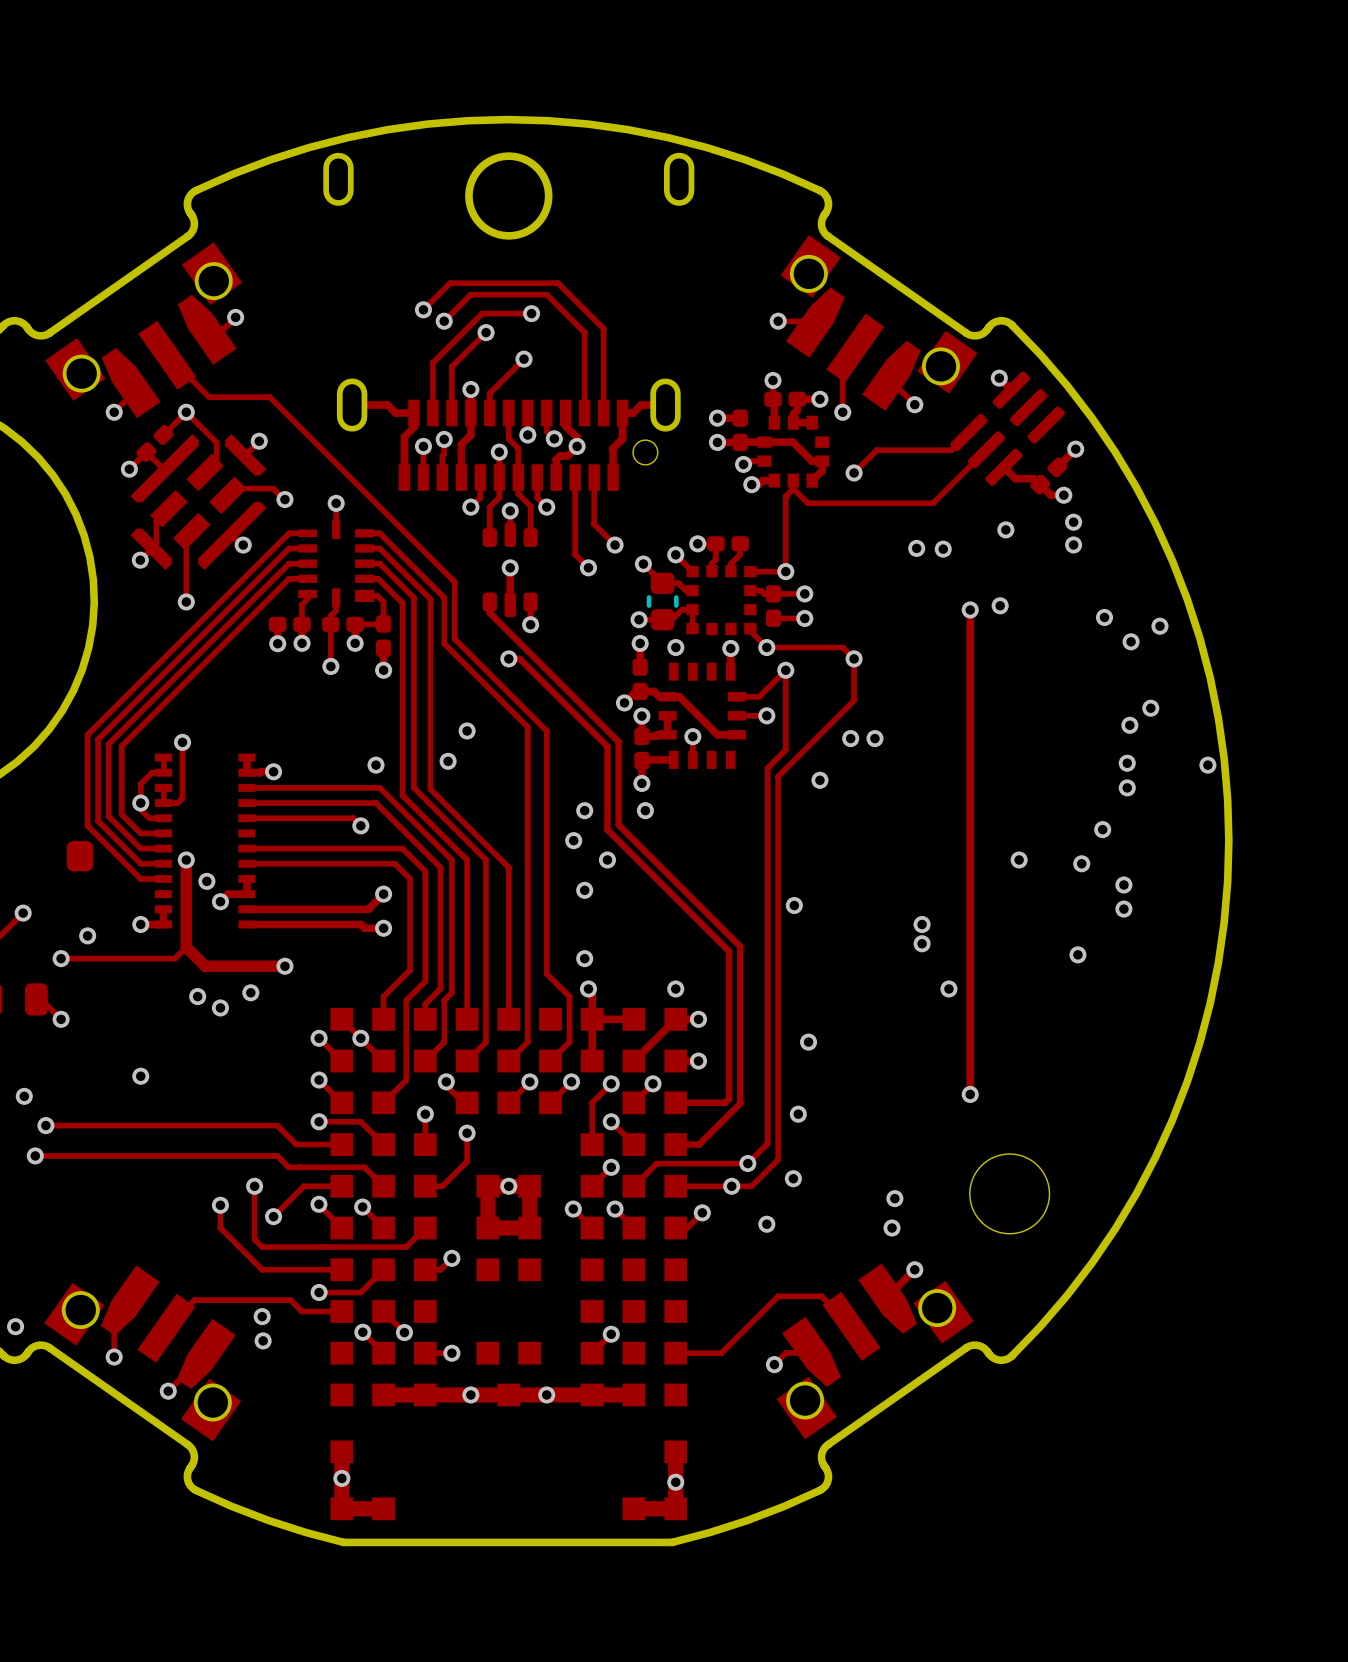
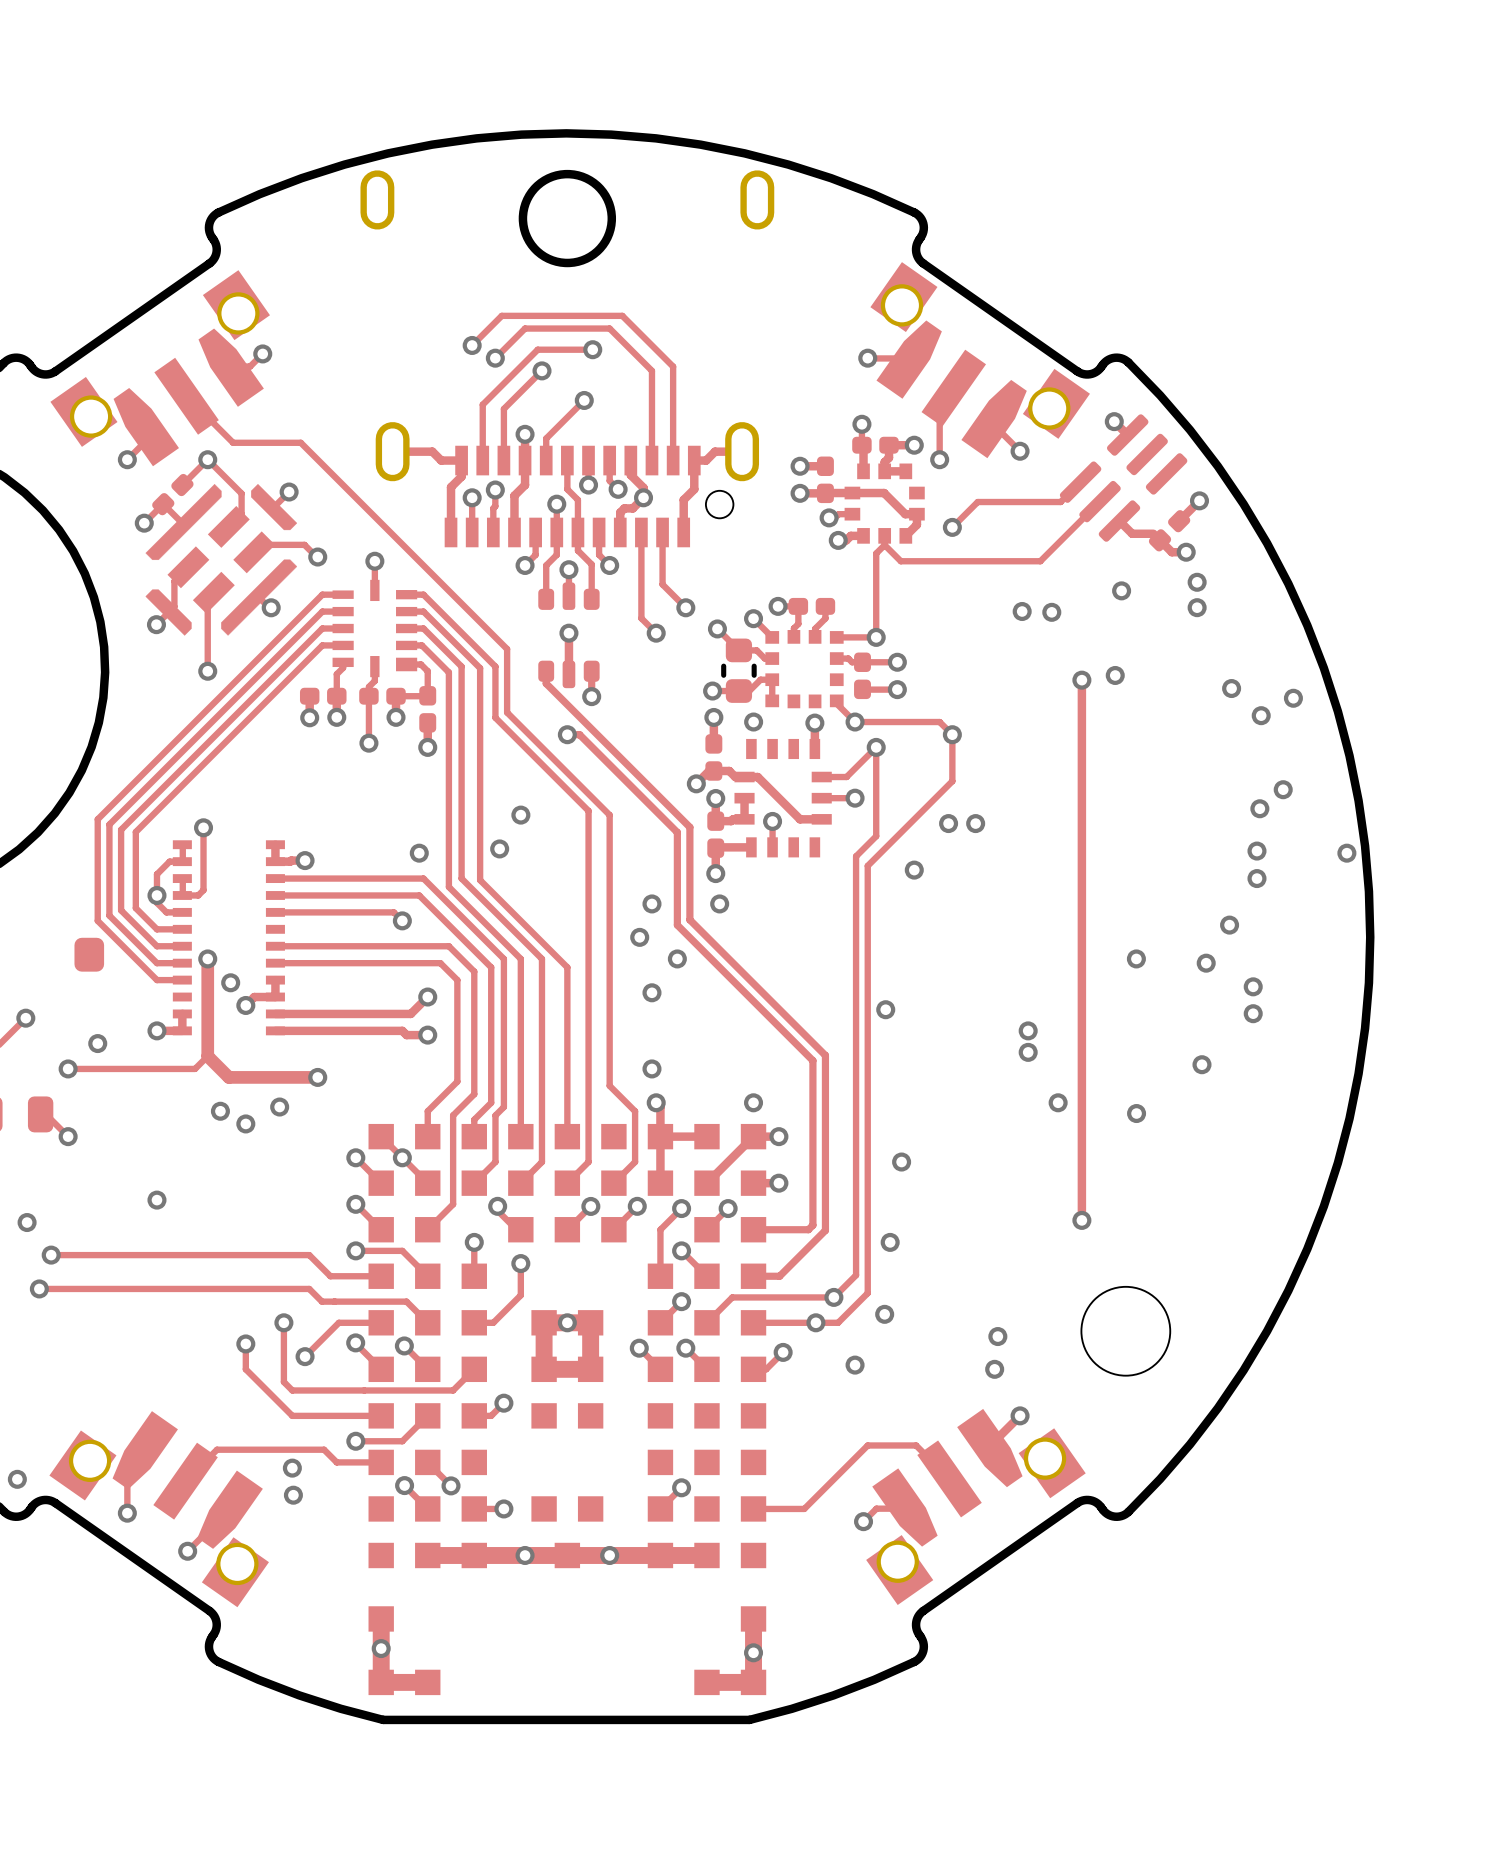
via: none -> (1136, 1113)

